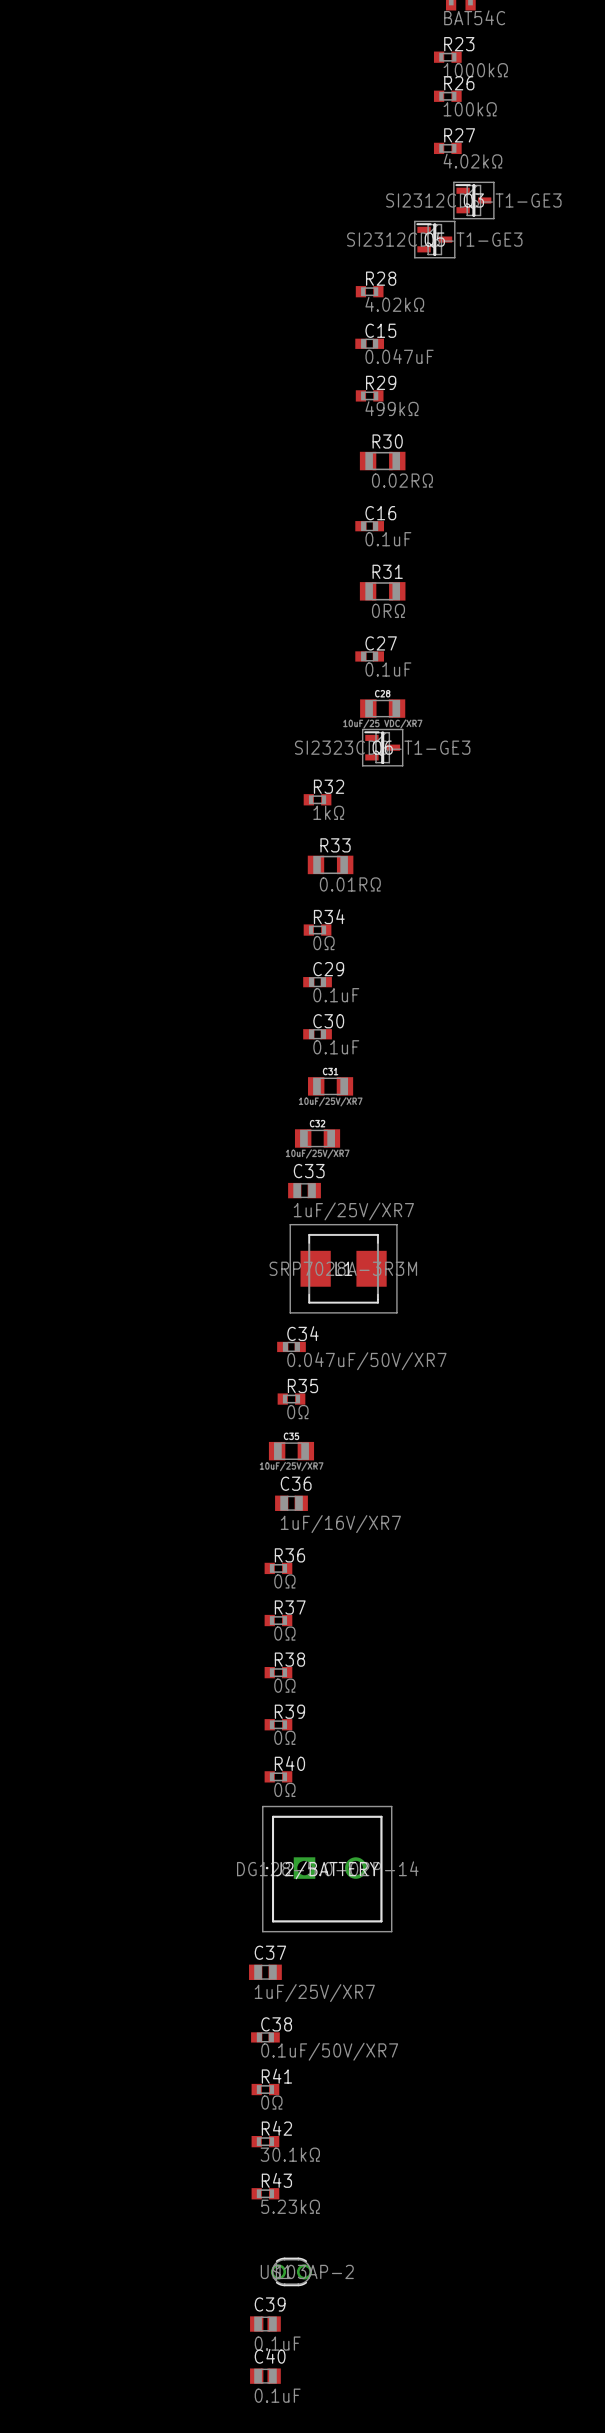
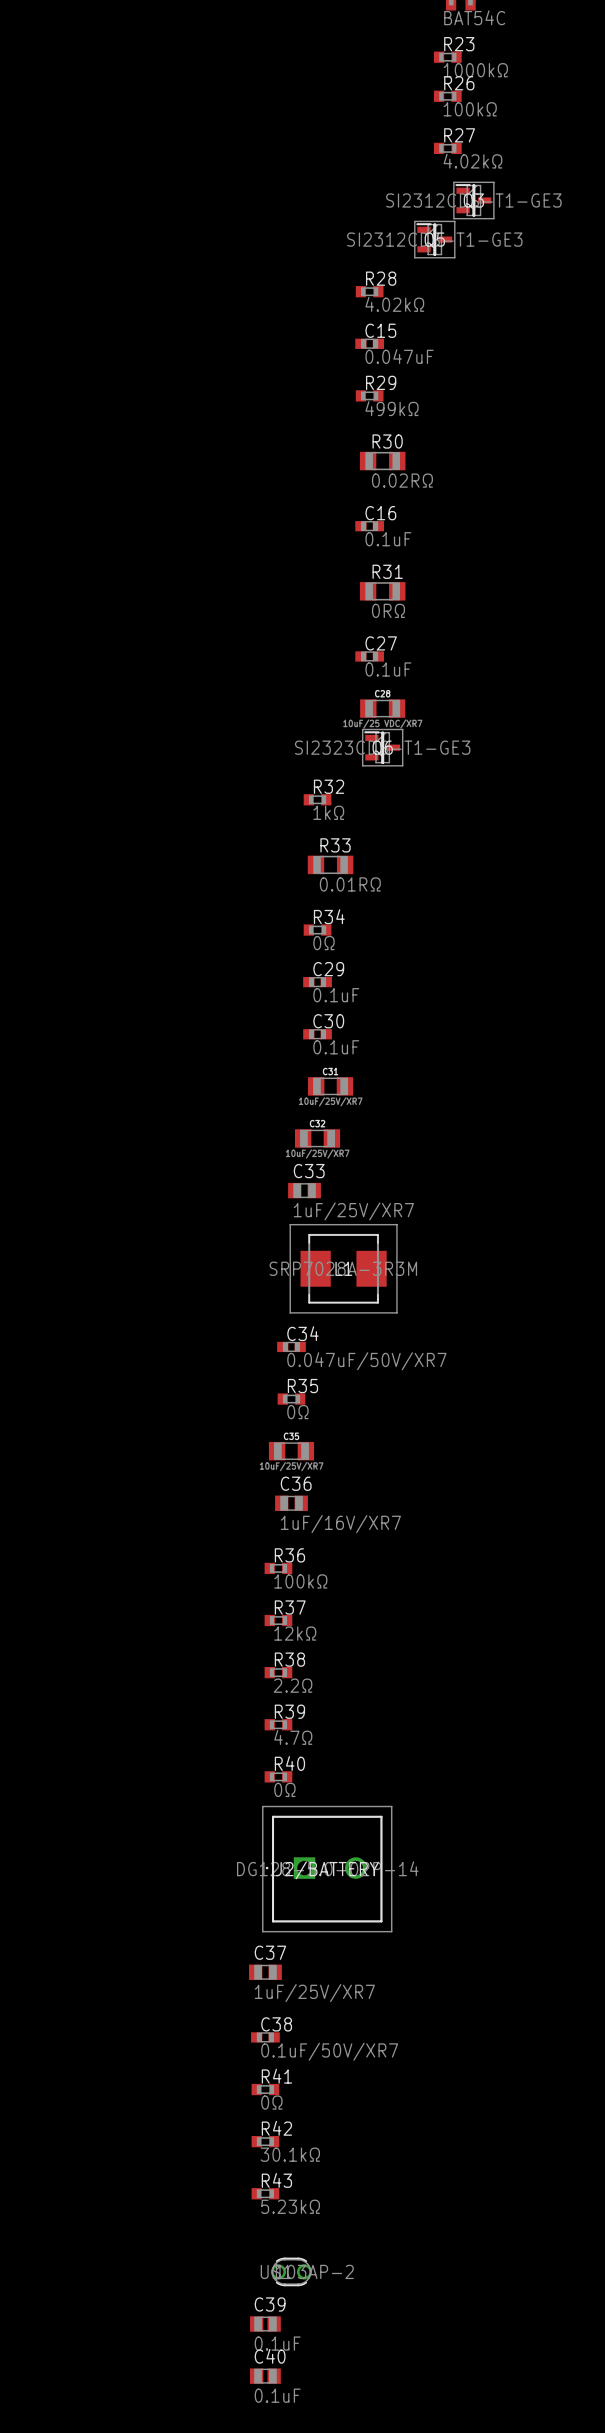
R36 value: 0Ω (284, 1581) -> 100kΩ (300, 1581)
R37 value: 0Ω (284, 1633) -> 12kΩ (295, 1633)
R38 value: 0Ω (284, 1685) -> 2.2Ω (293, 1685)
R39 value: 0Ω (284, 1737) -> 4.7Ω (293, 1737)

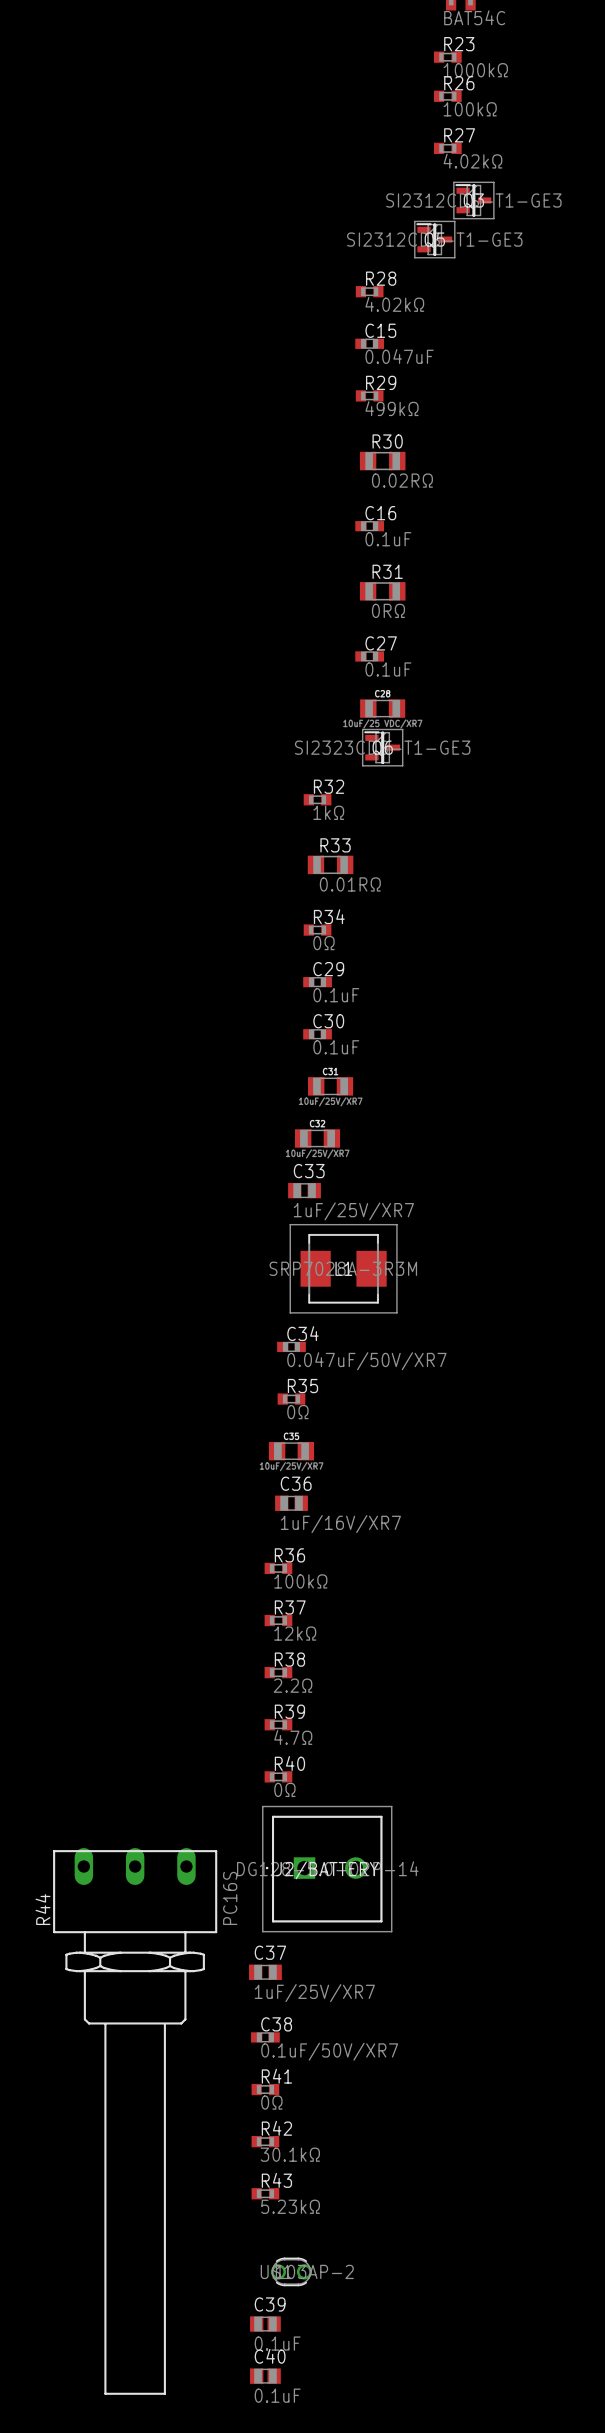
R44: none -> PC16S (135, 2121)

